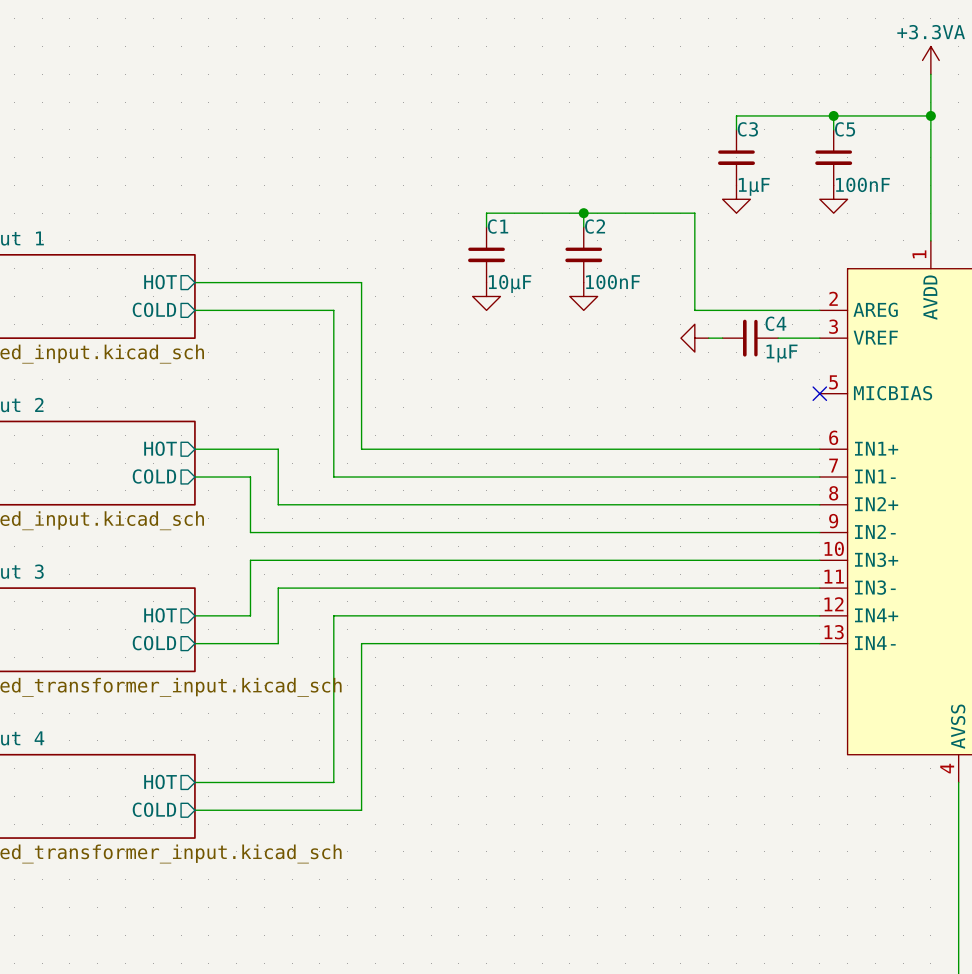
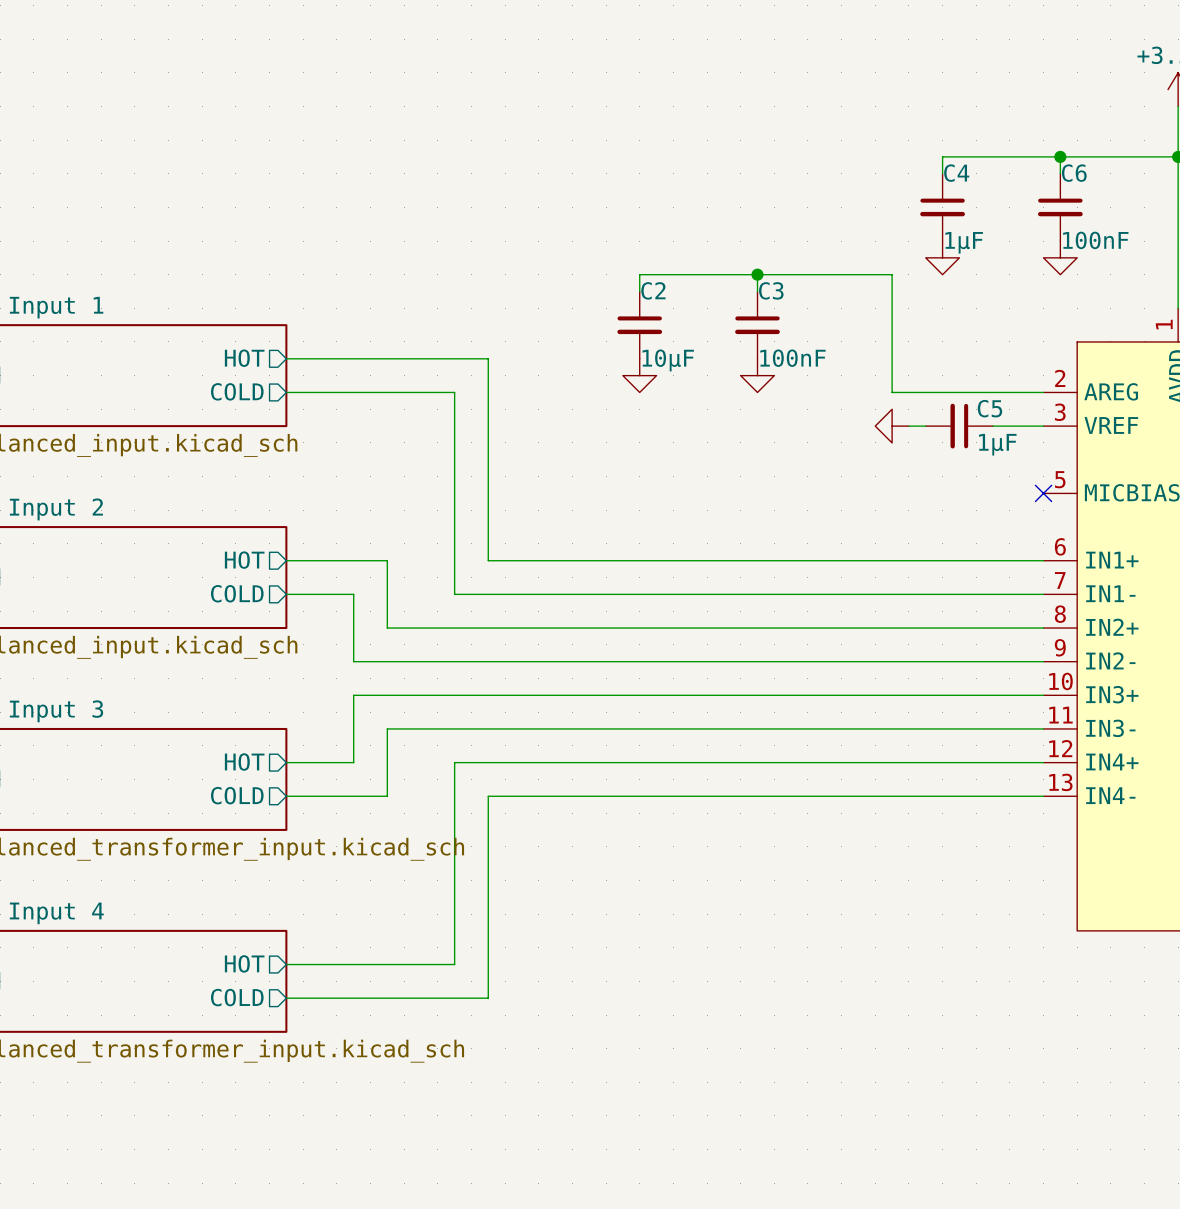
C3 name: C3 (747, 129) -> C4 (956, 173)
C5 name: C5 (845, 129) -> C6 (1074, 173)
C1 name: C1 (498, 226) -> C2 (653, 290)
C2 name: C2 (595, 226) -> C3 (771, 290)
C4 name: C4 (775, 323) -> C5 (989, 408)

